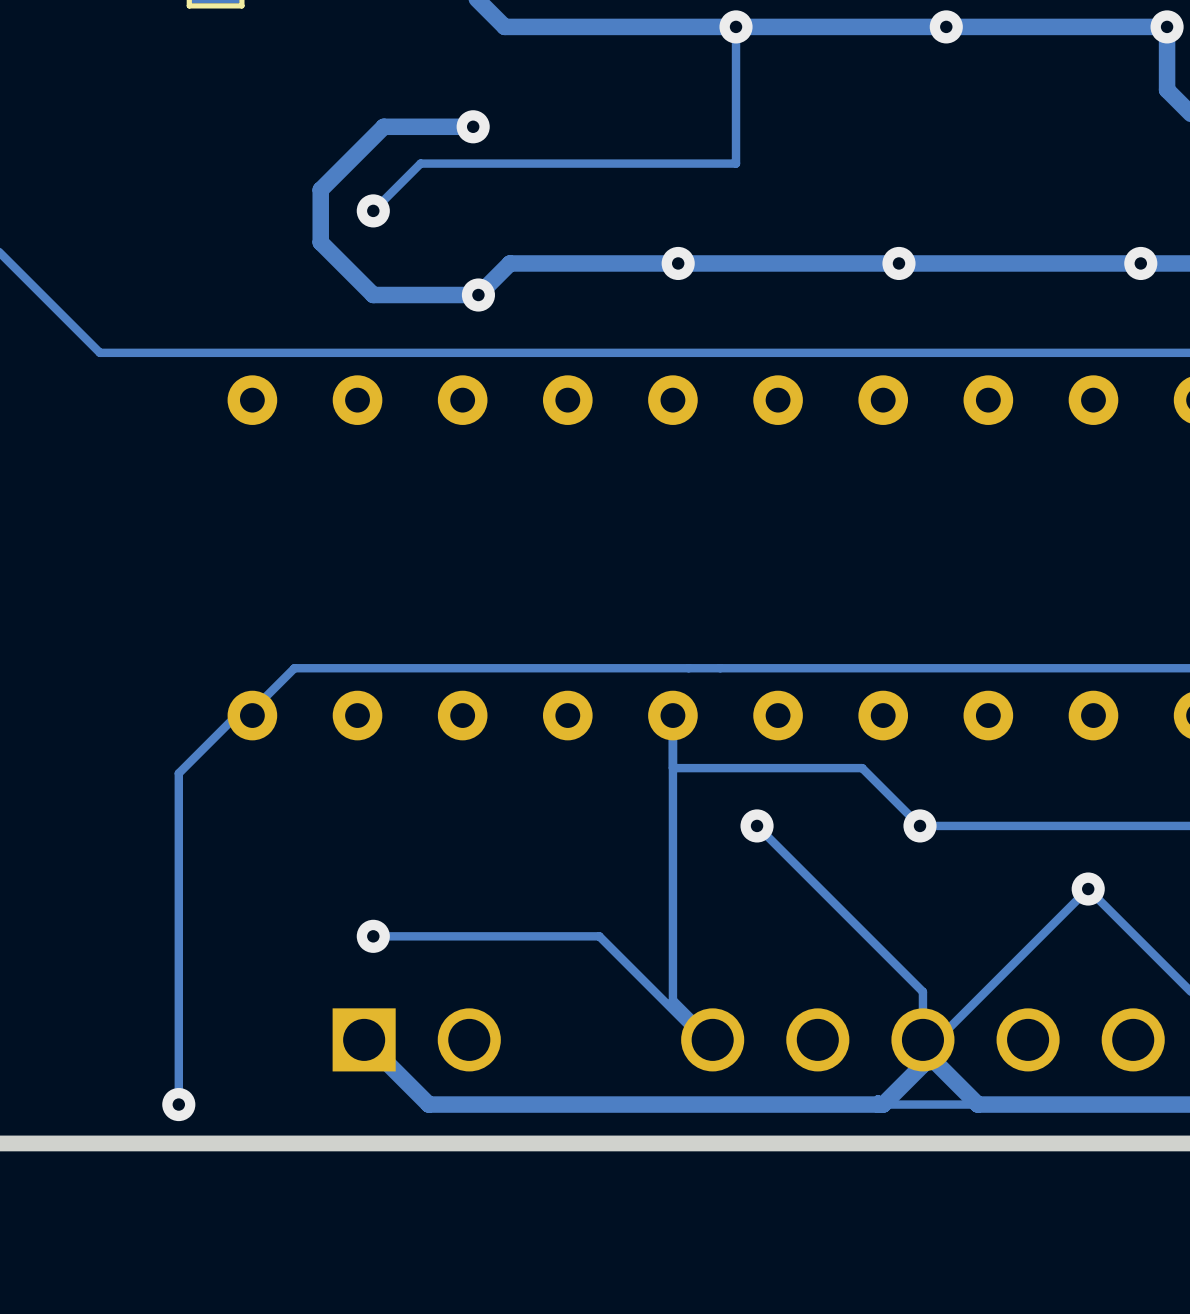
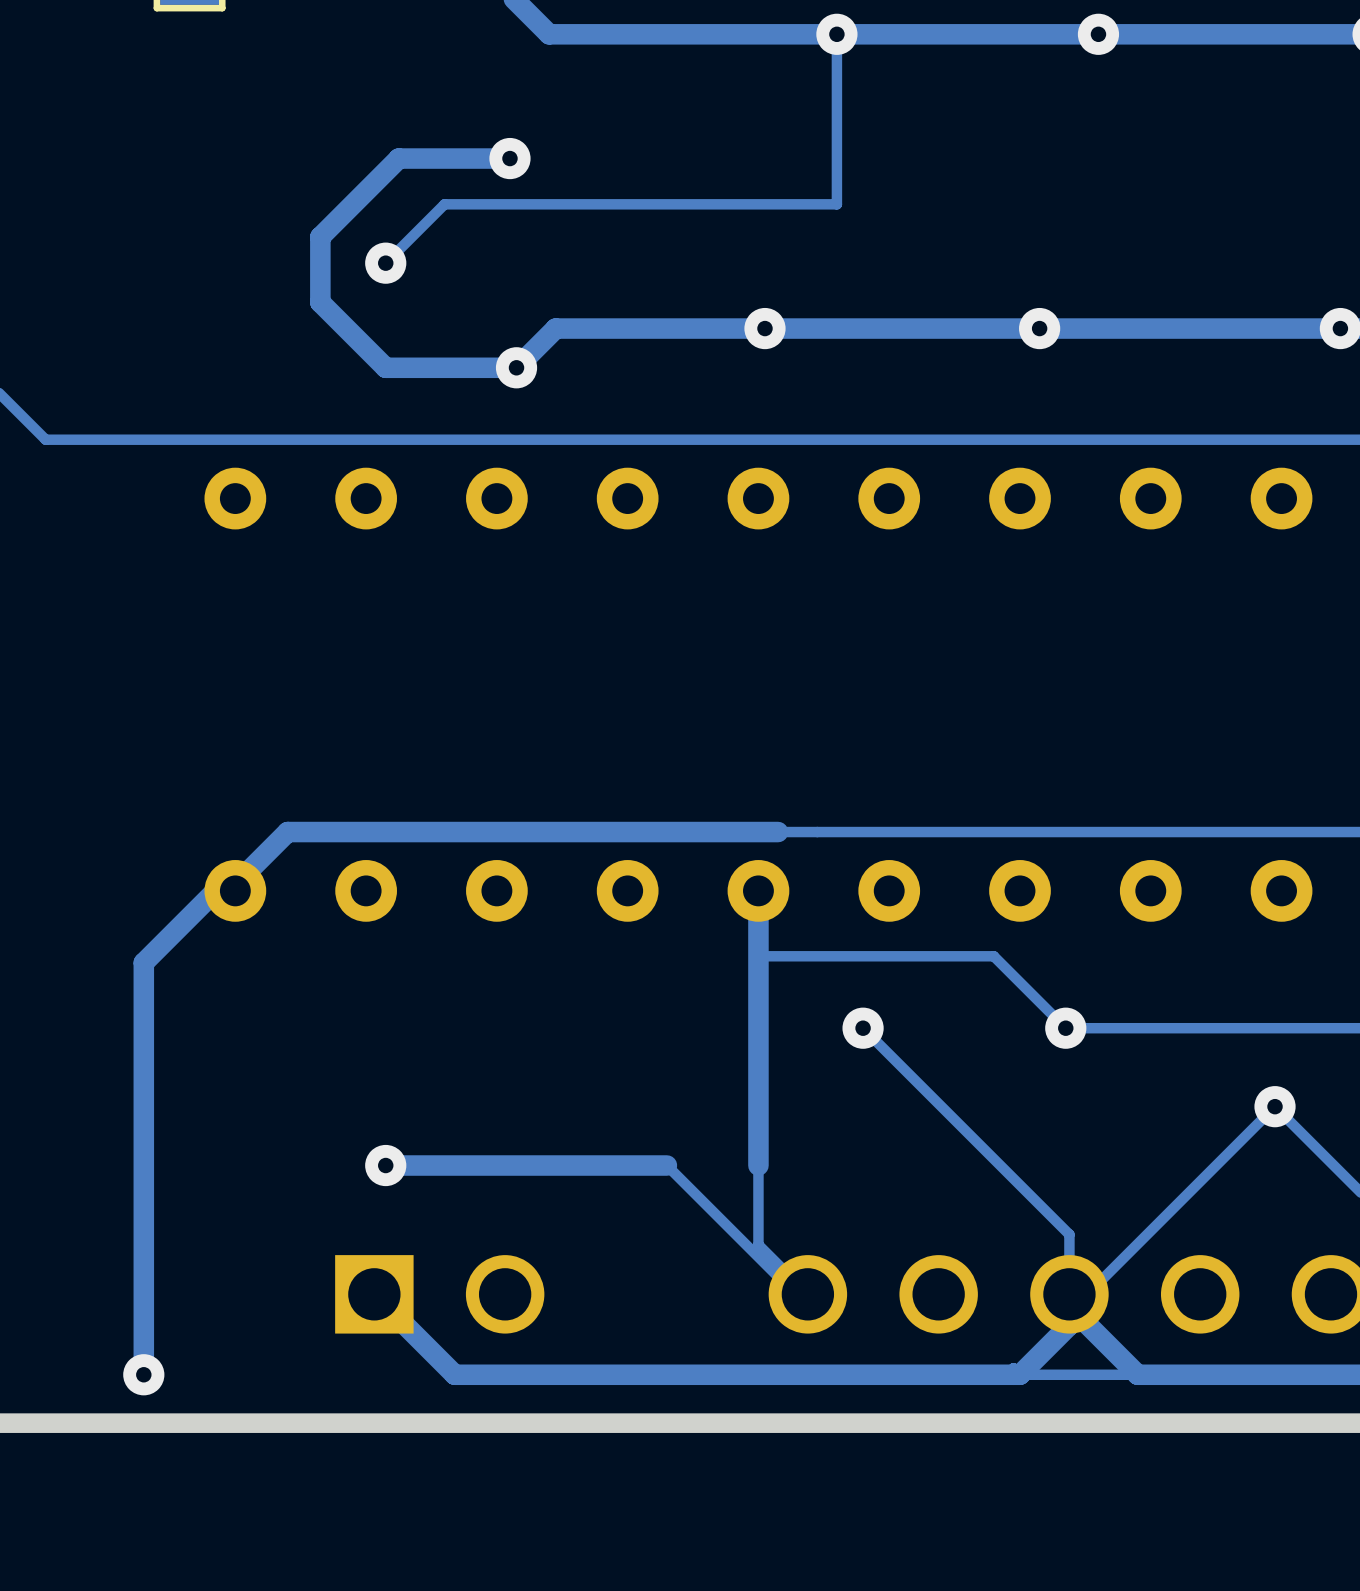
track width: thin (688, 668) (294, 668) (252, 710) -> thick (778, 832) (287, 832) (235, 884)
track width: thin (236, 715) (178, 773) (178, 1104) -> thick (215, 890) (143, 962) (143, 1374)
track width: thin (672, 715) (672, 936) -> thick (758, 890) (758, 1165)
track width: thin (599, 936) (373, 936) -> thick (666, 1165) (385, 1165)

